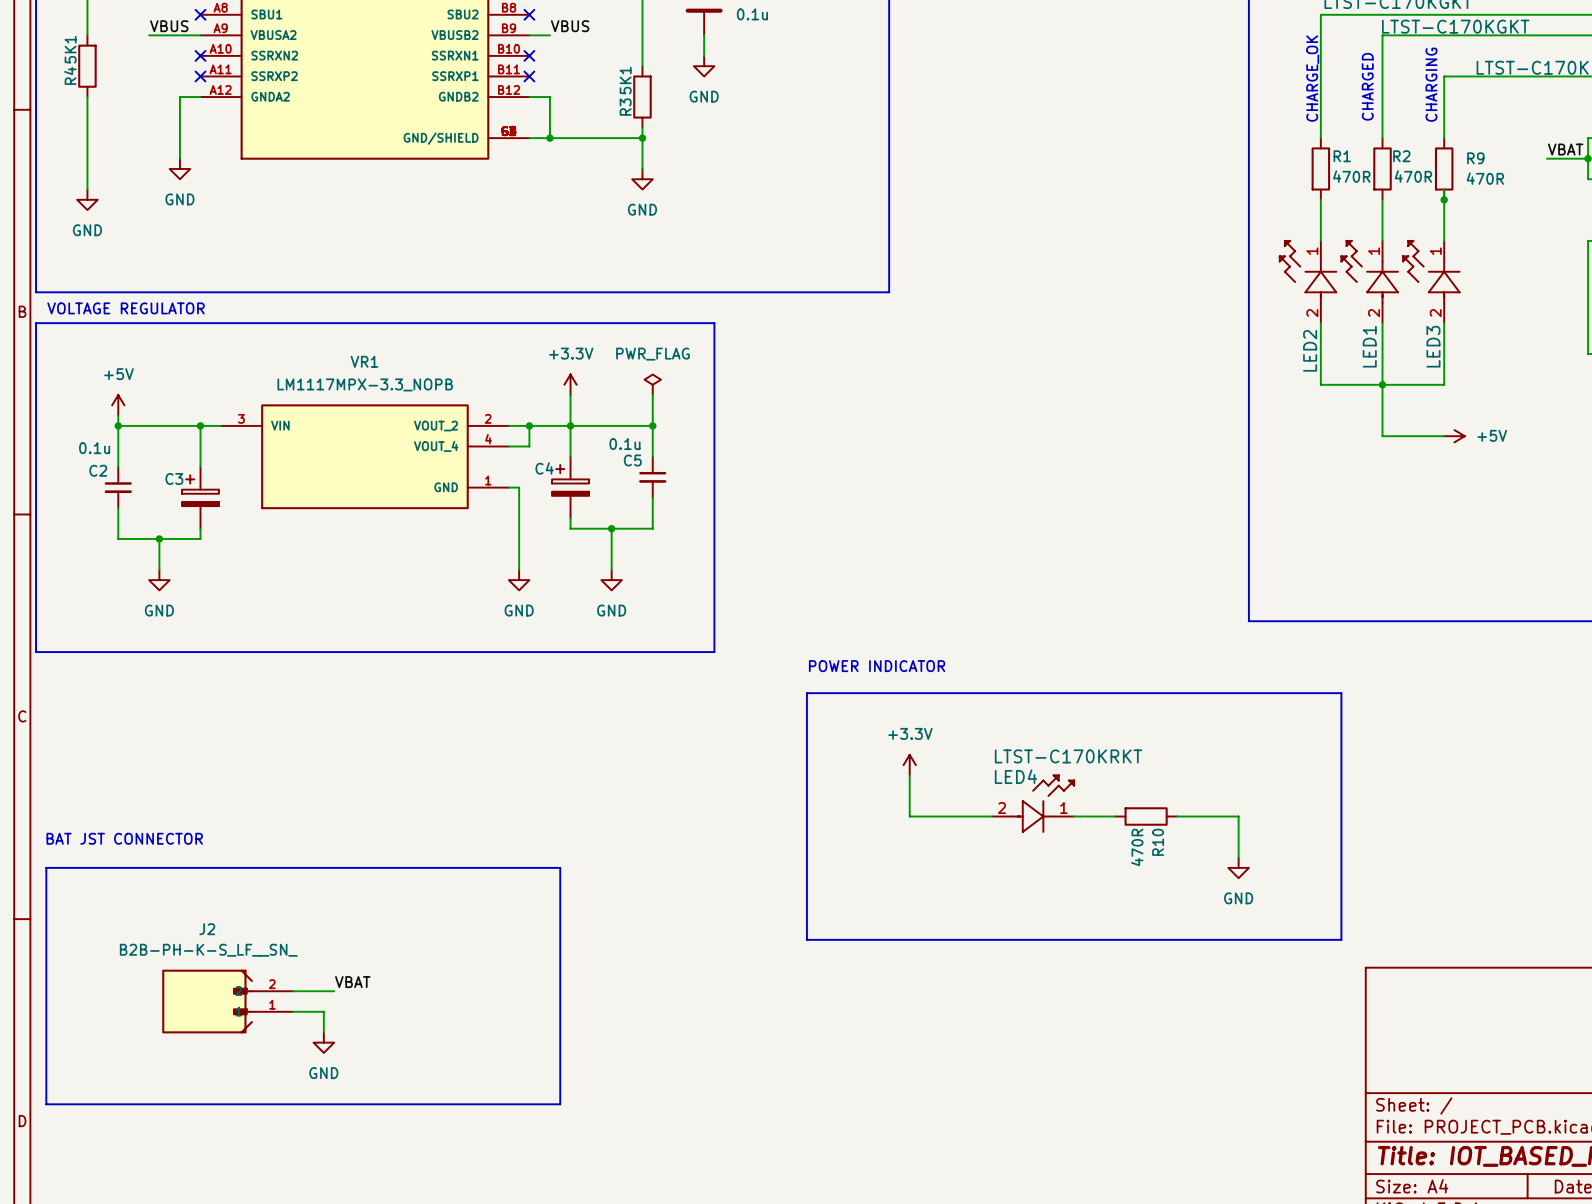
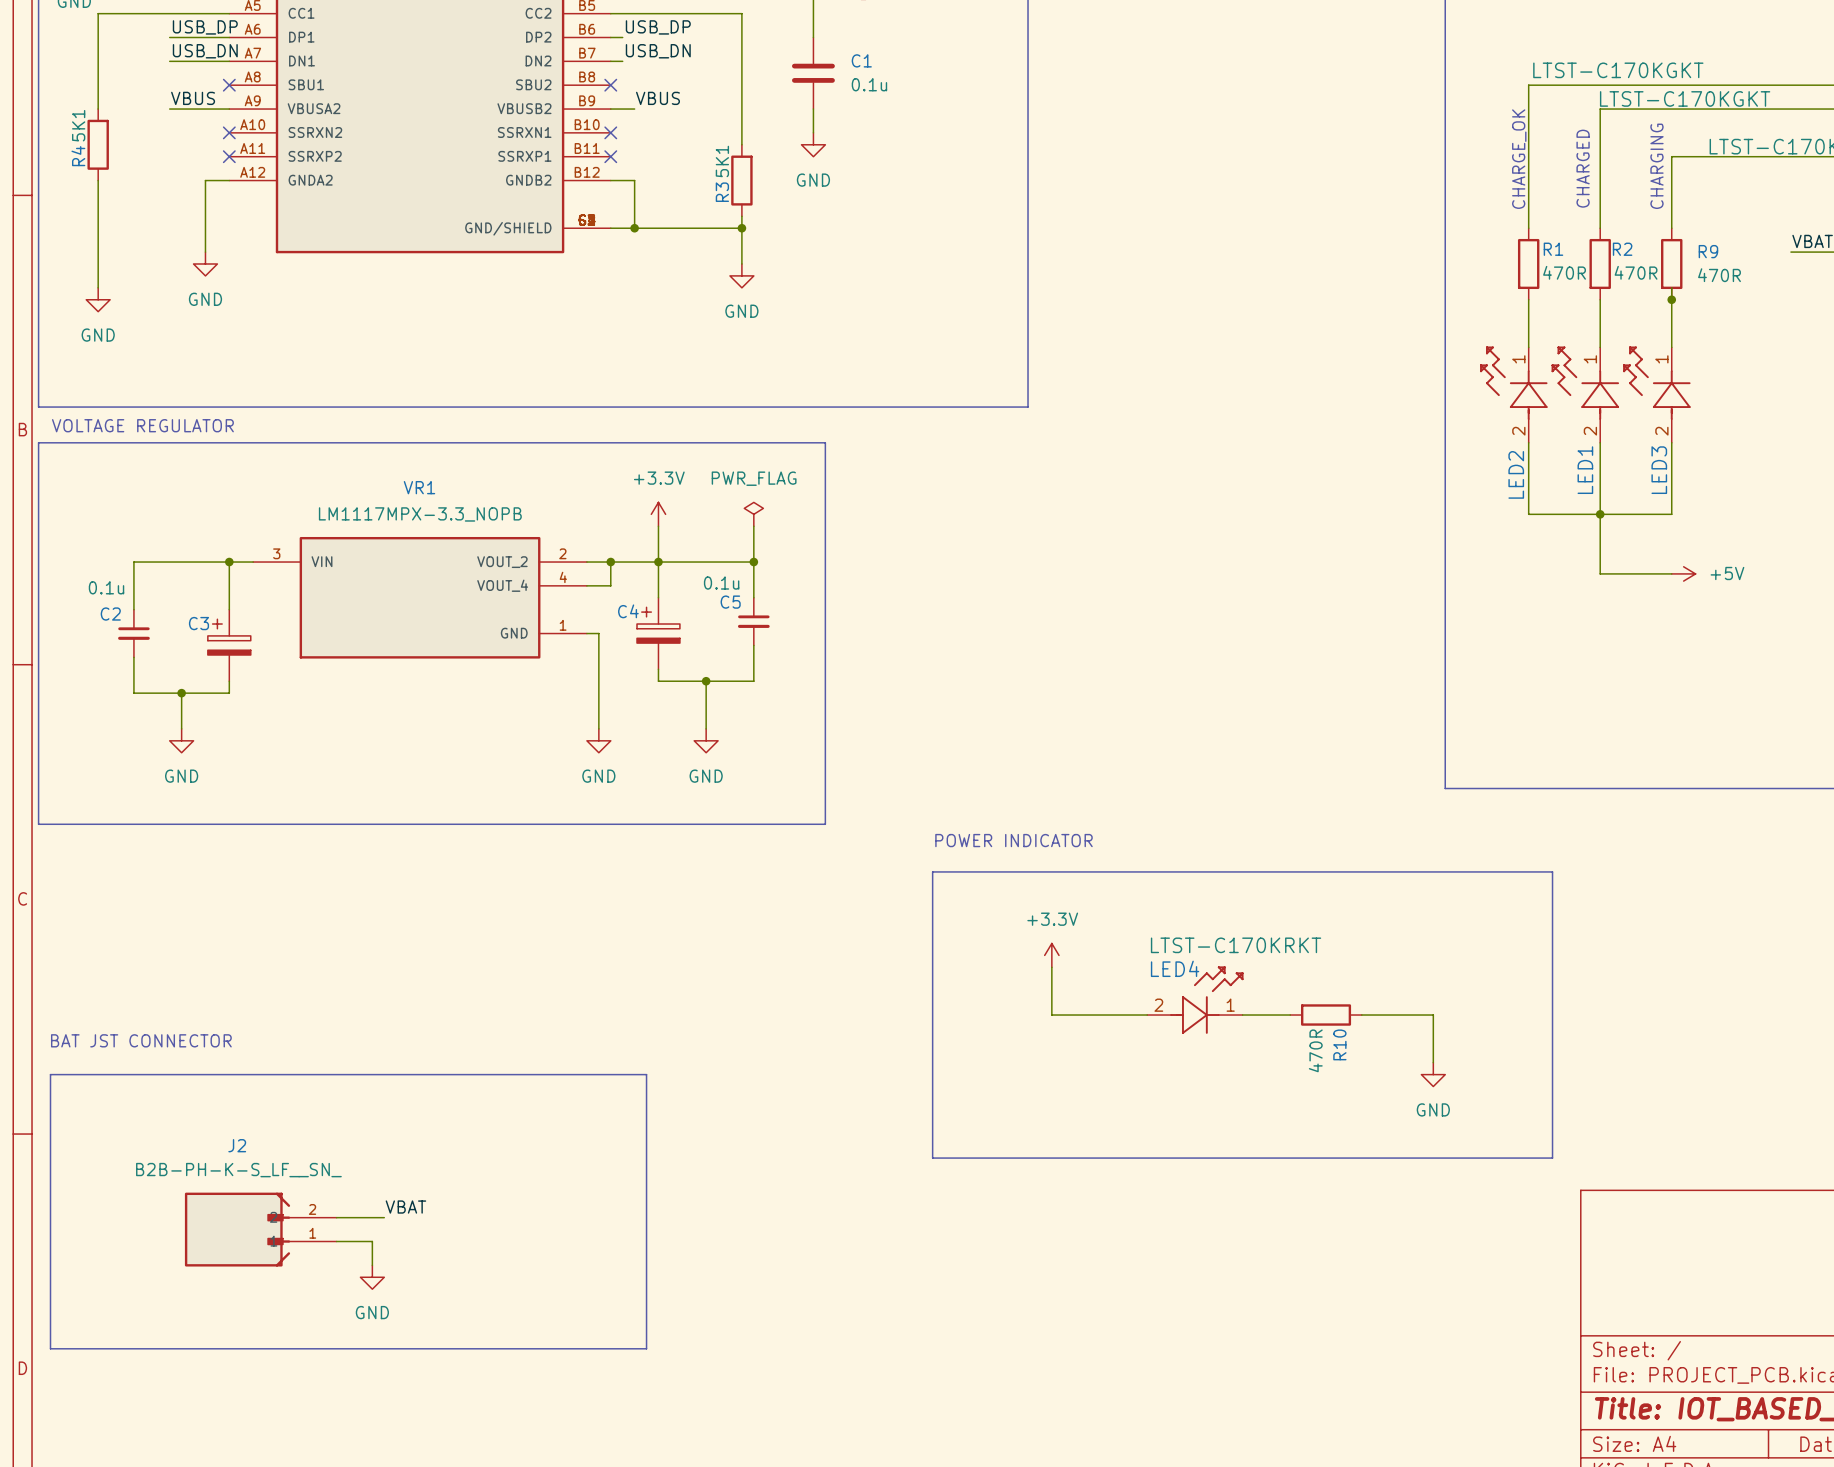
power symbol: +5V (118, 405) -> none
wire: (118, 415) (118, 425) -> none
junction: (118, 425) -> none

